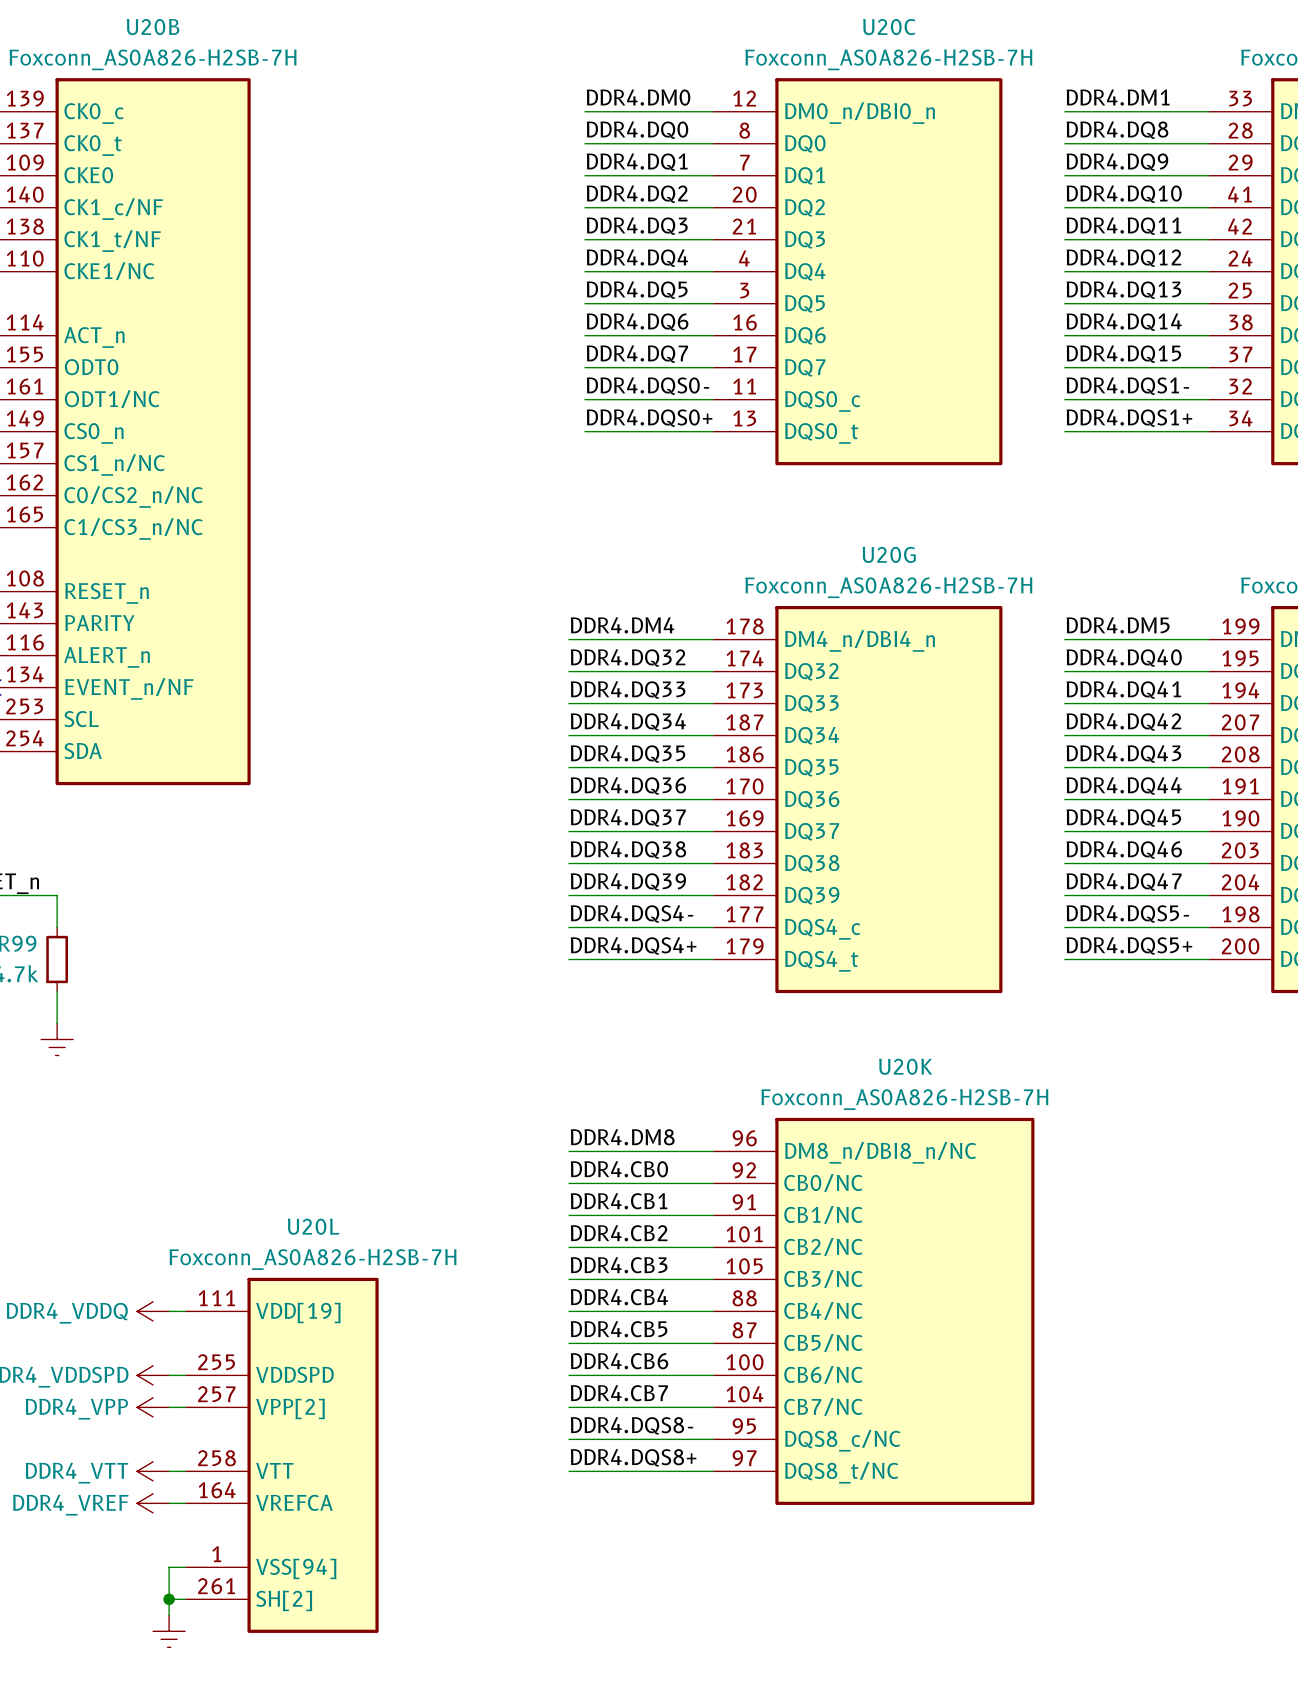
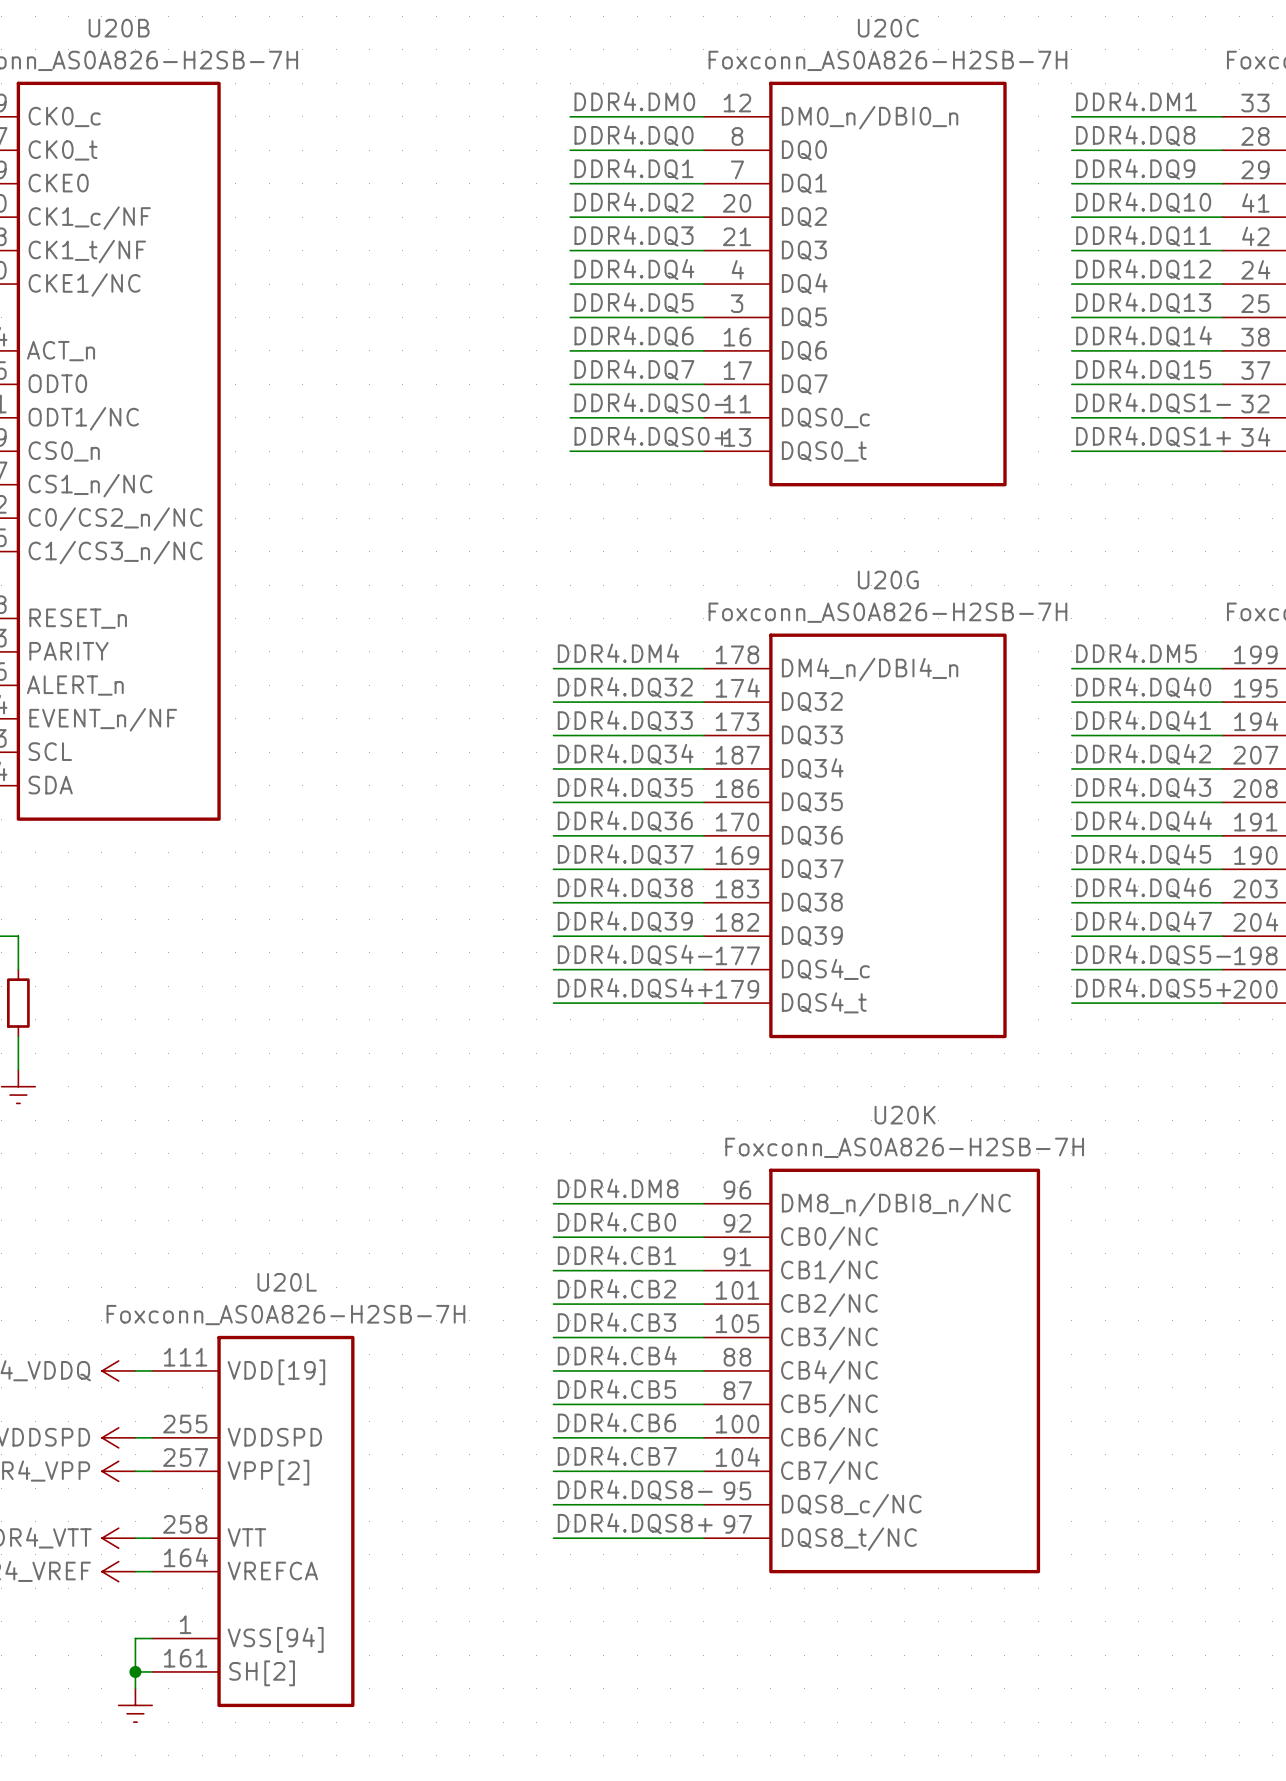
U20L pin number: 261 (216, 1586) -> 161 (185, 1658)

